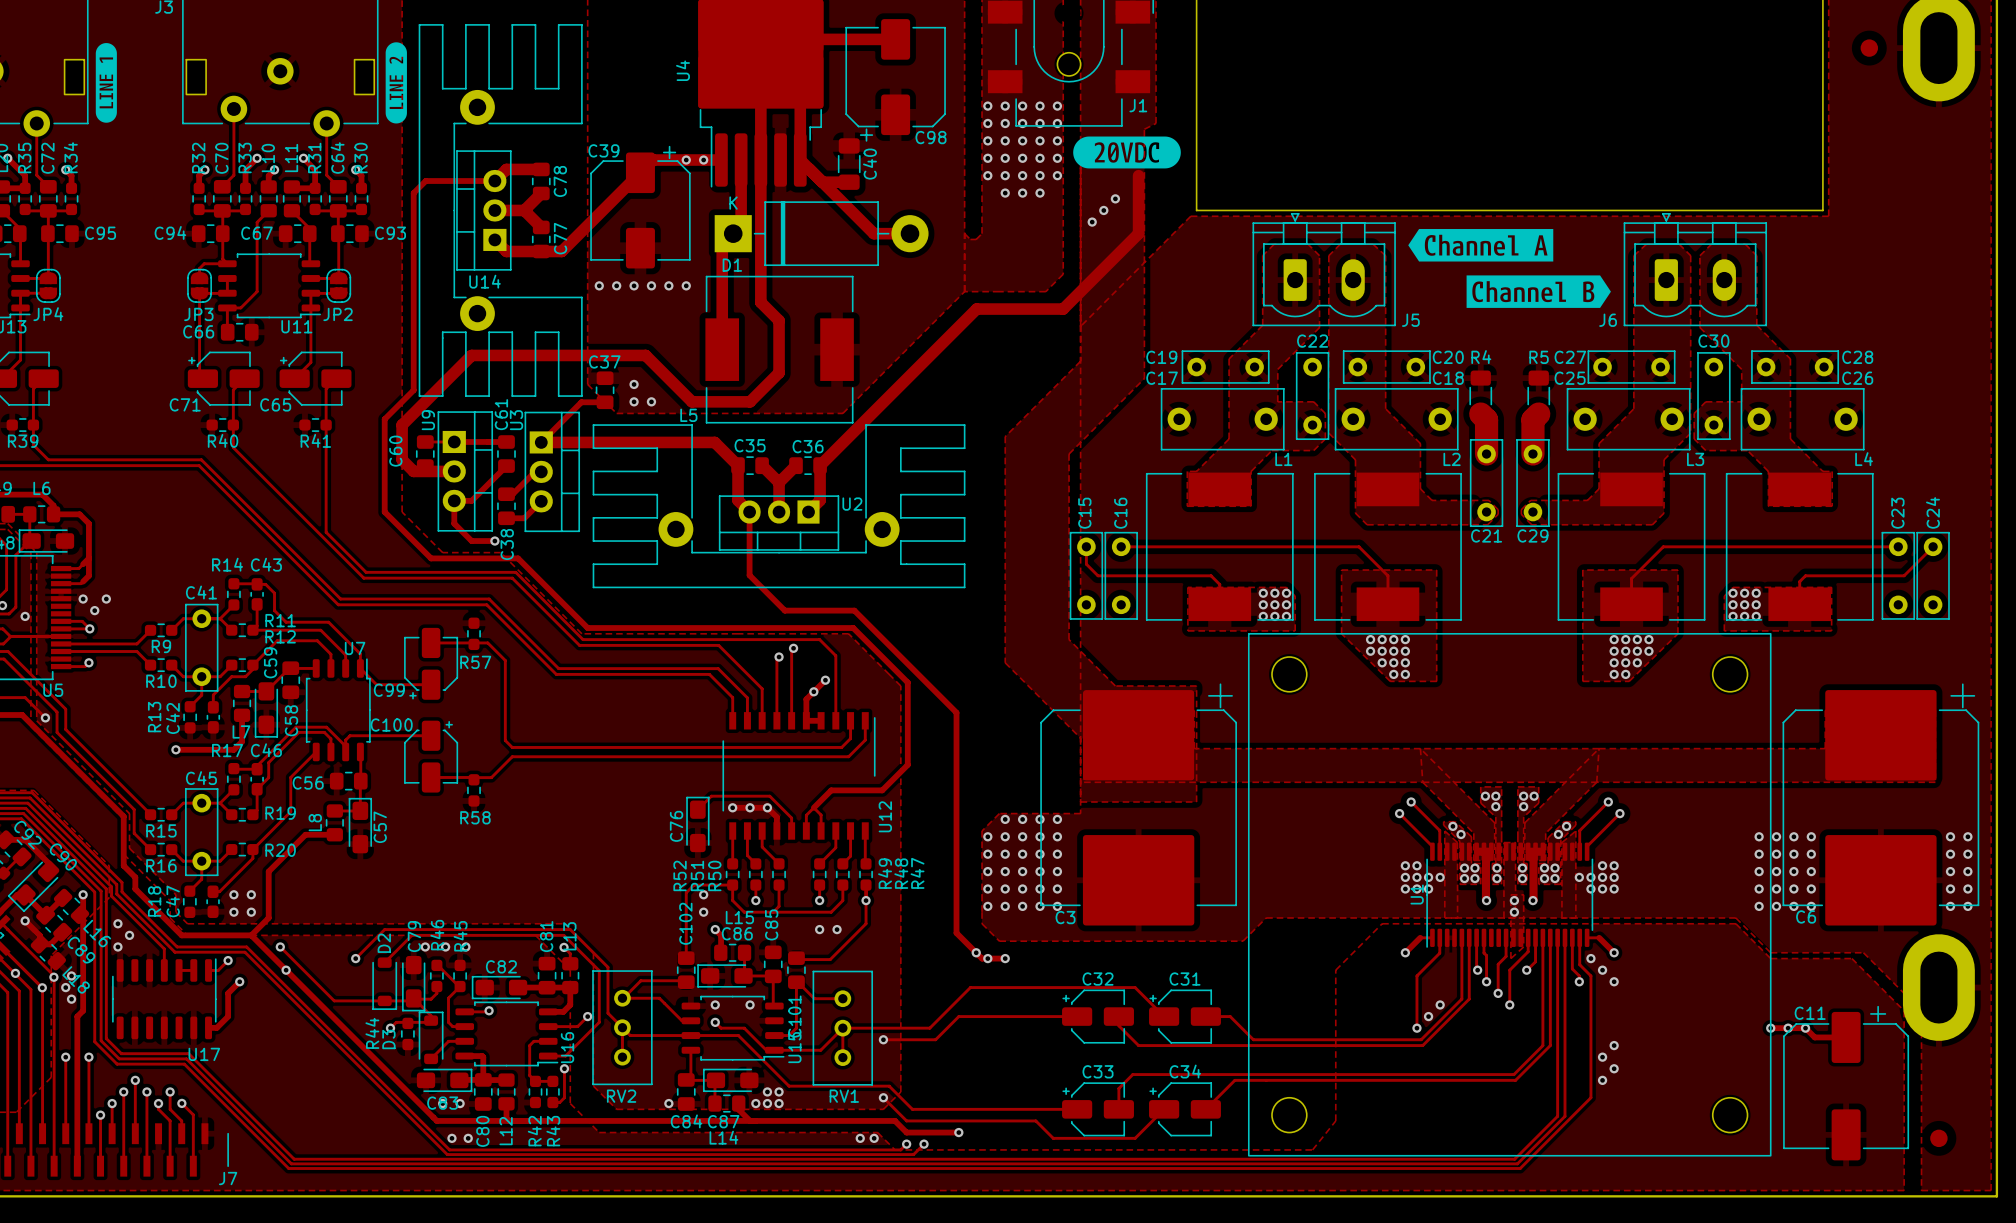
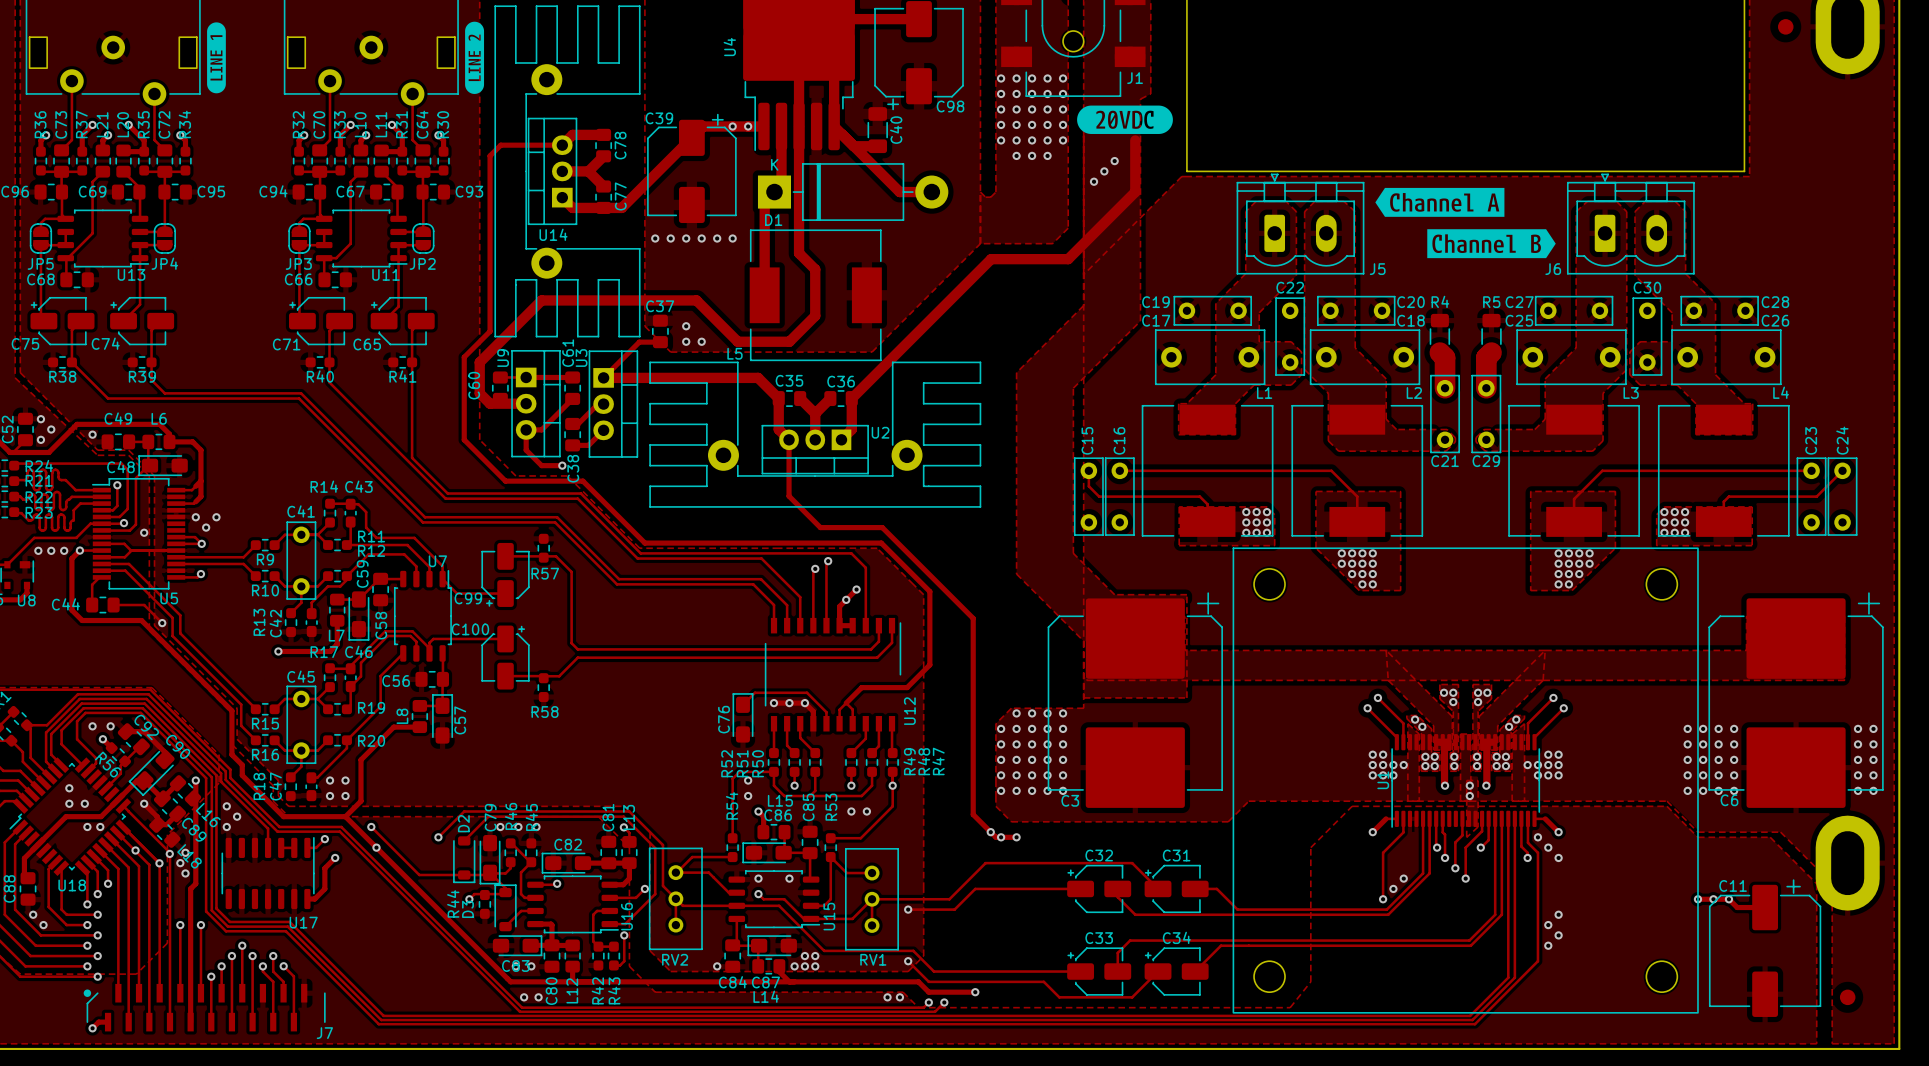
C102: (686, 970) -> none
R54: none -> (732, 847)
C101: (796, 970) -> none
R53: none -> (830, 847)

